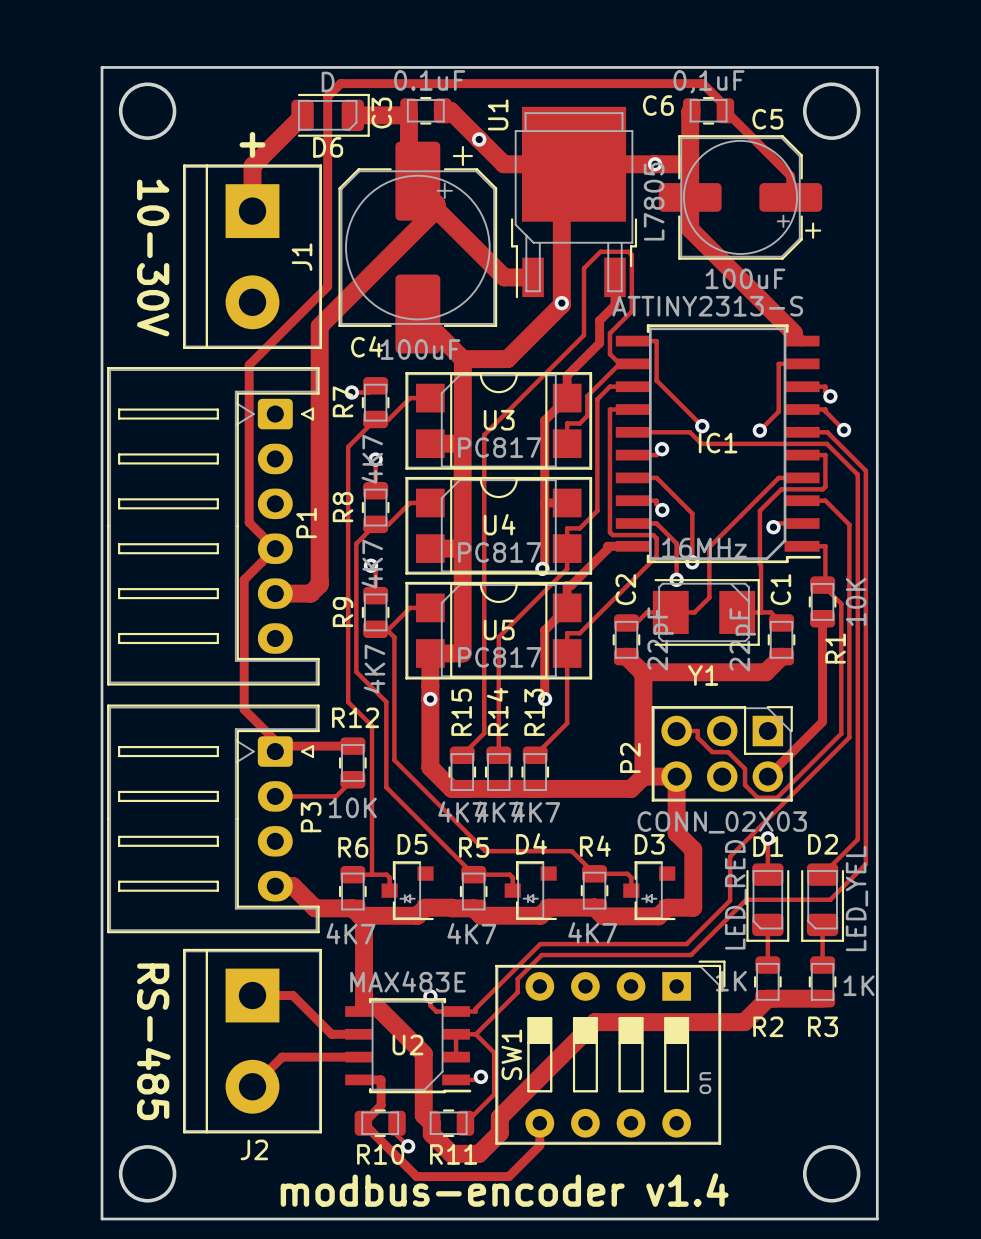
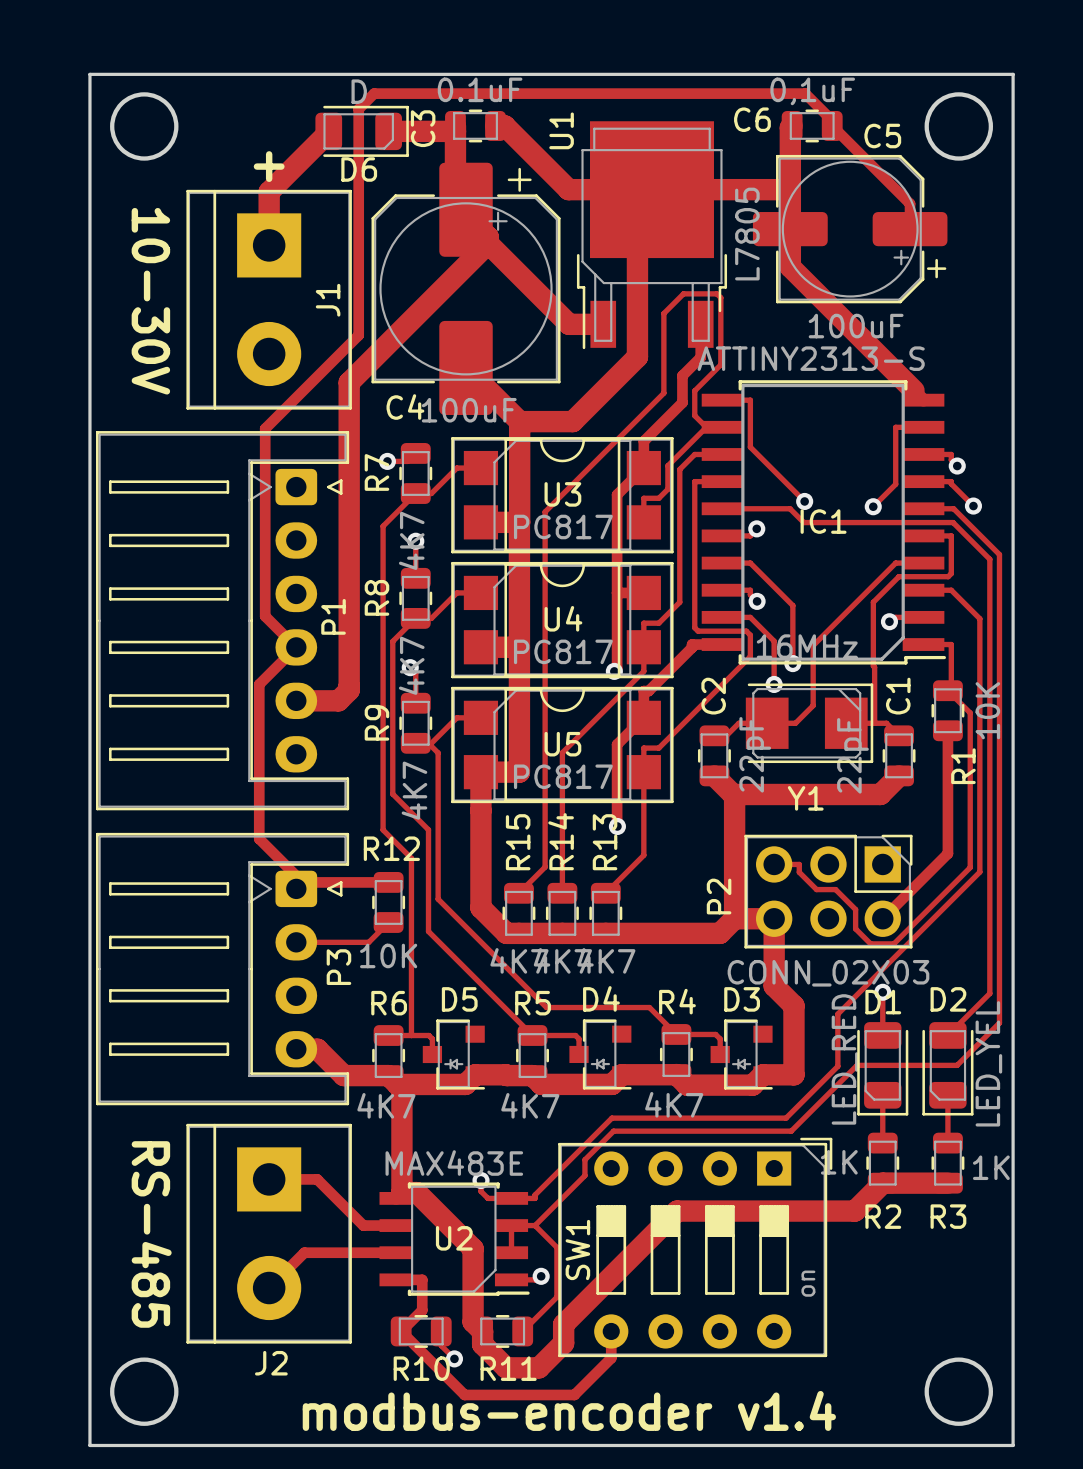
via: (479, 139) -> none
via: (655, 164) -> none
via: (561, 303) -> none
via: (430, 699) -> none

